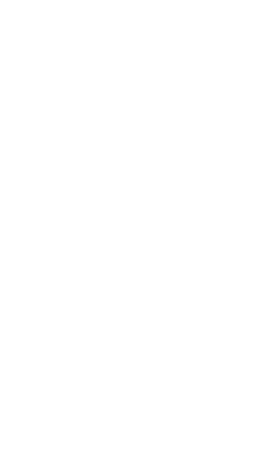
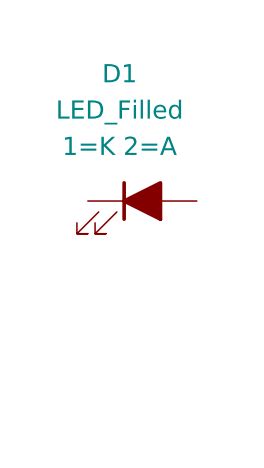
D1: none -> LED_Filled (136, 207)

